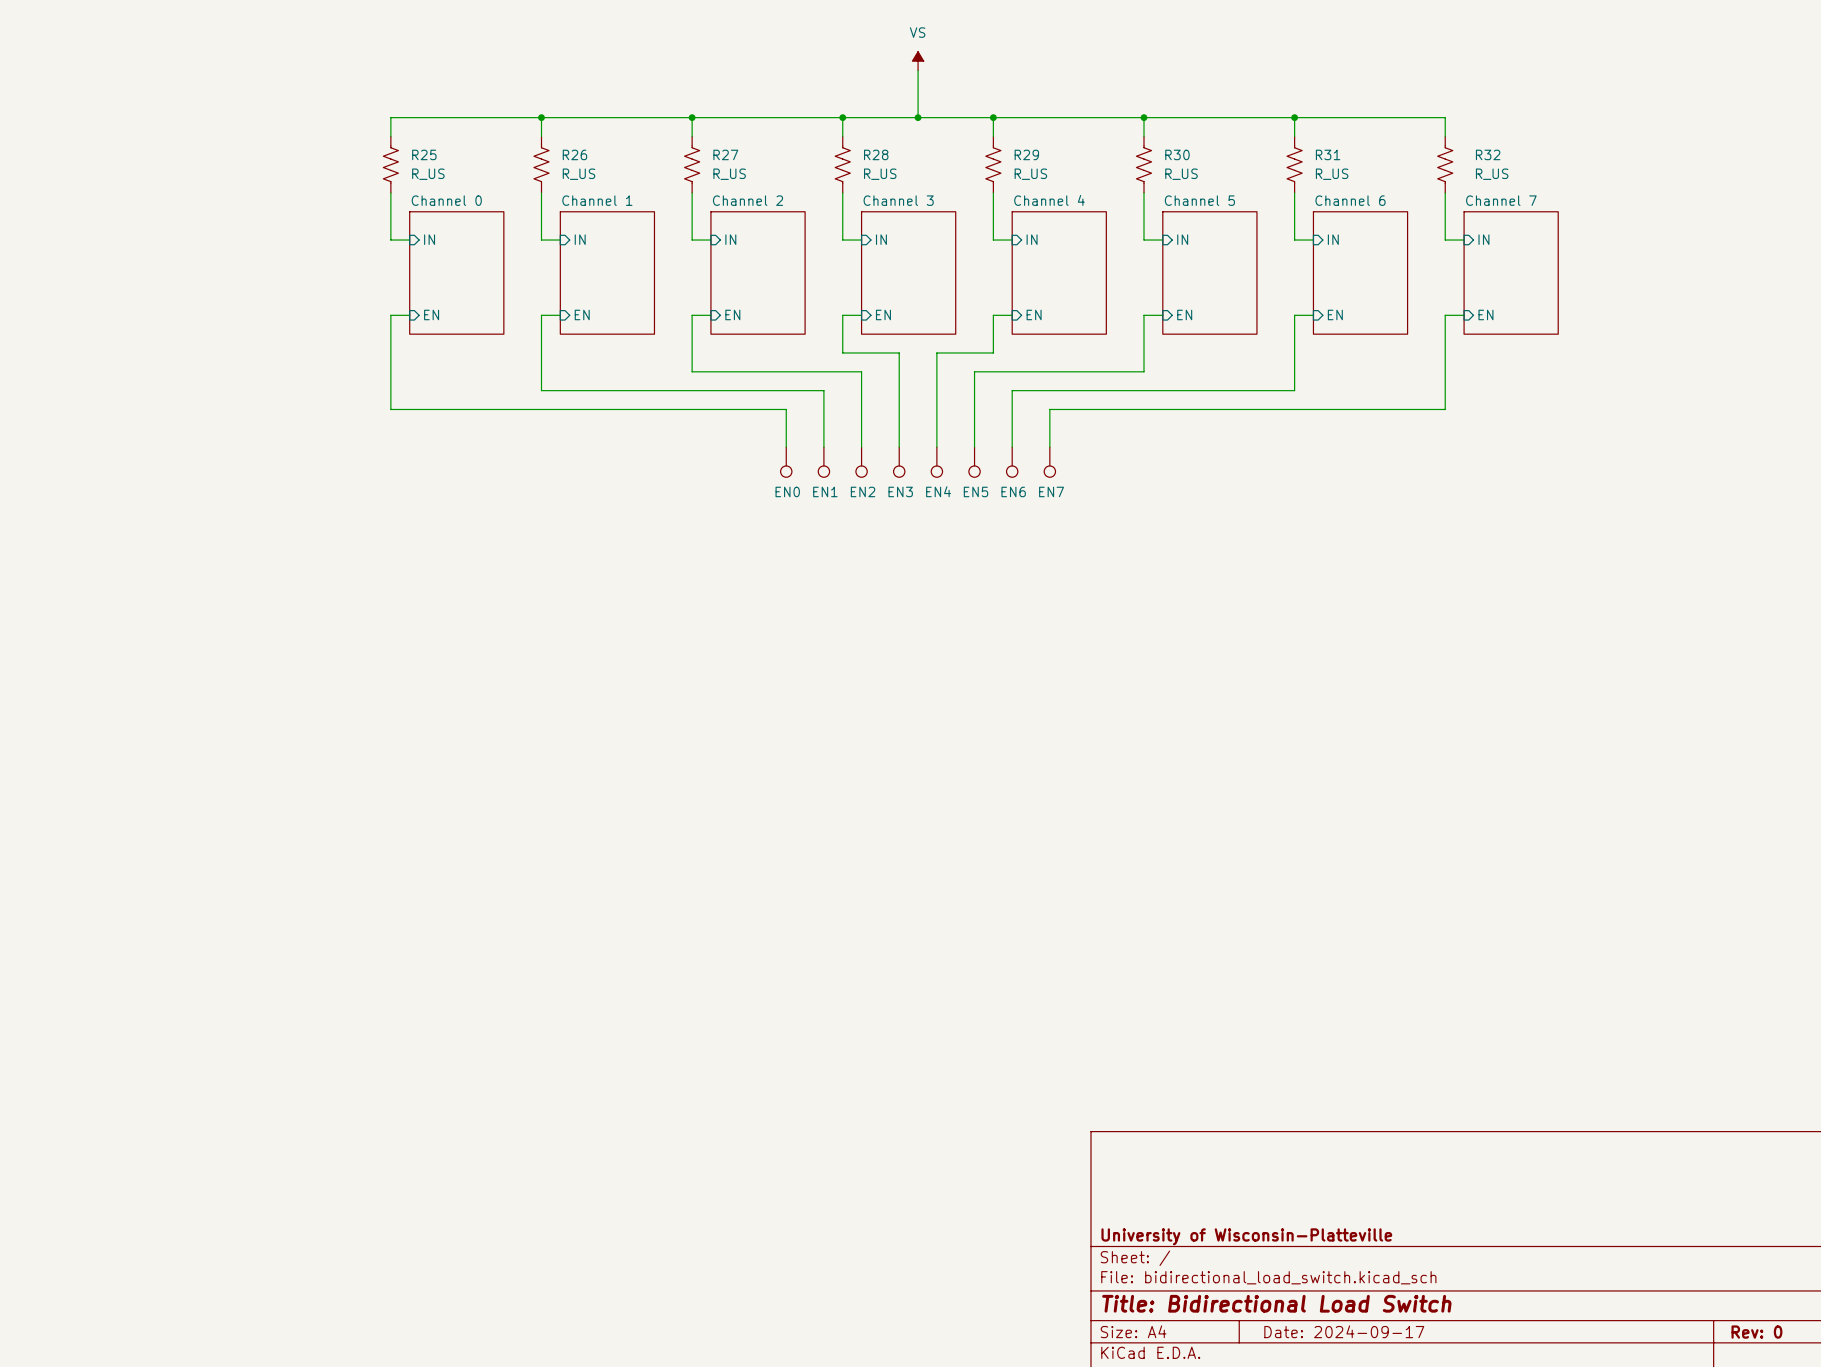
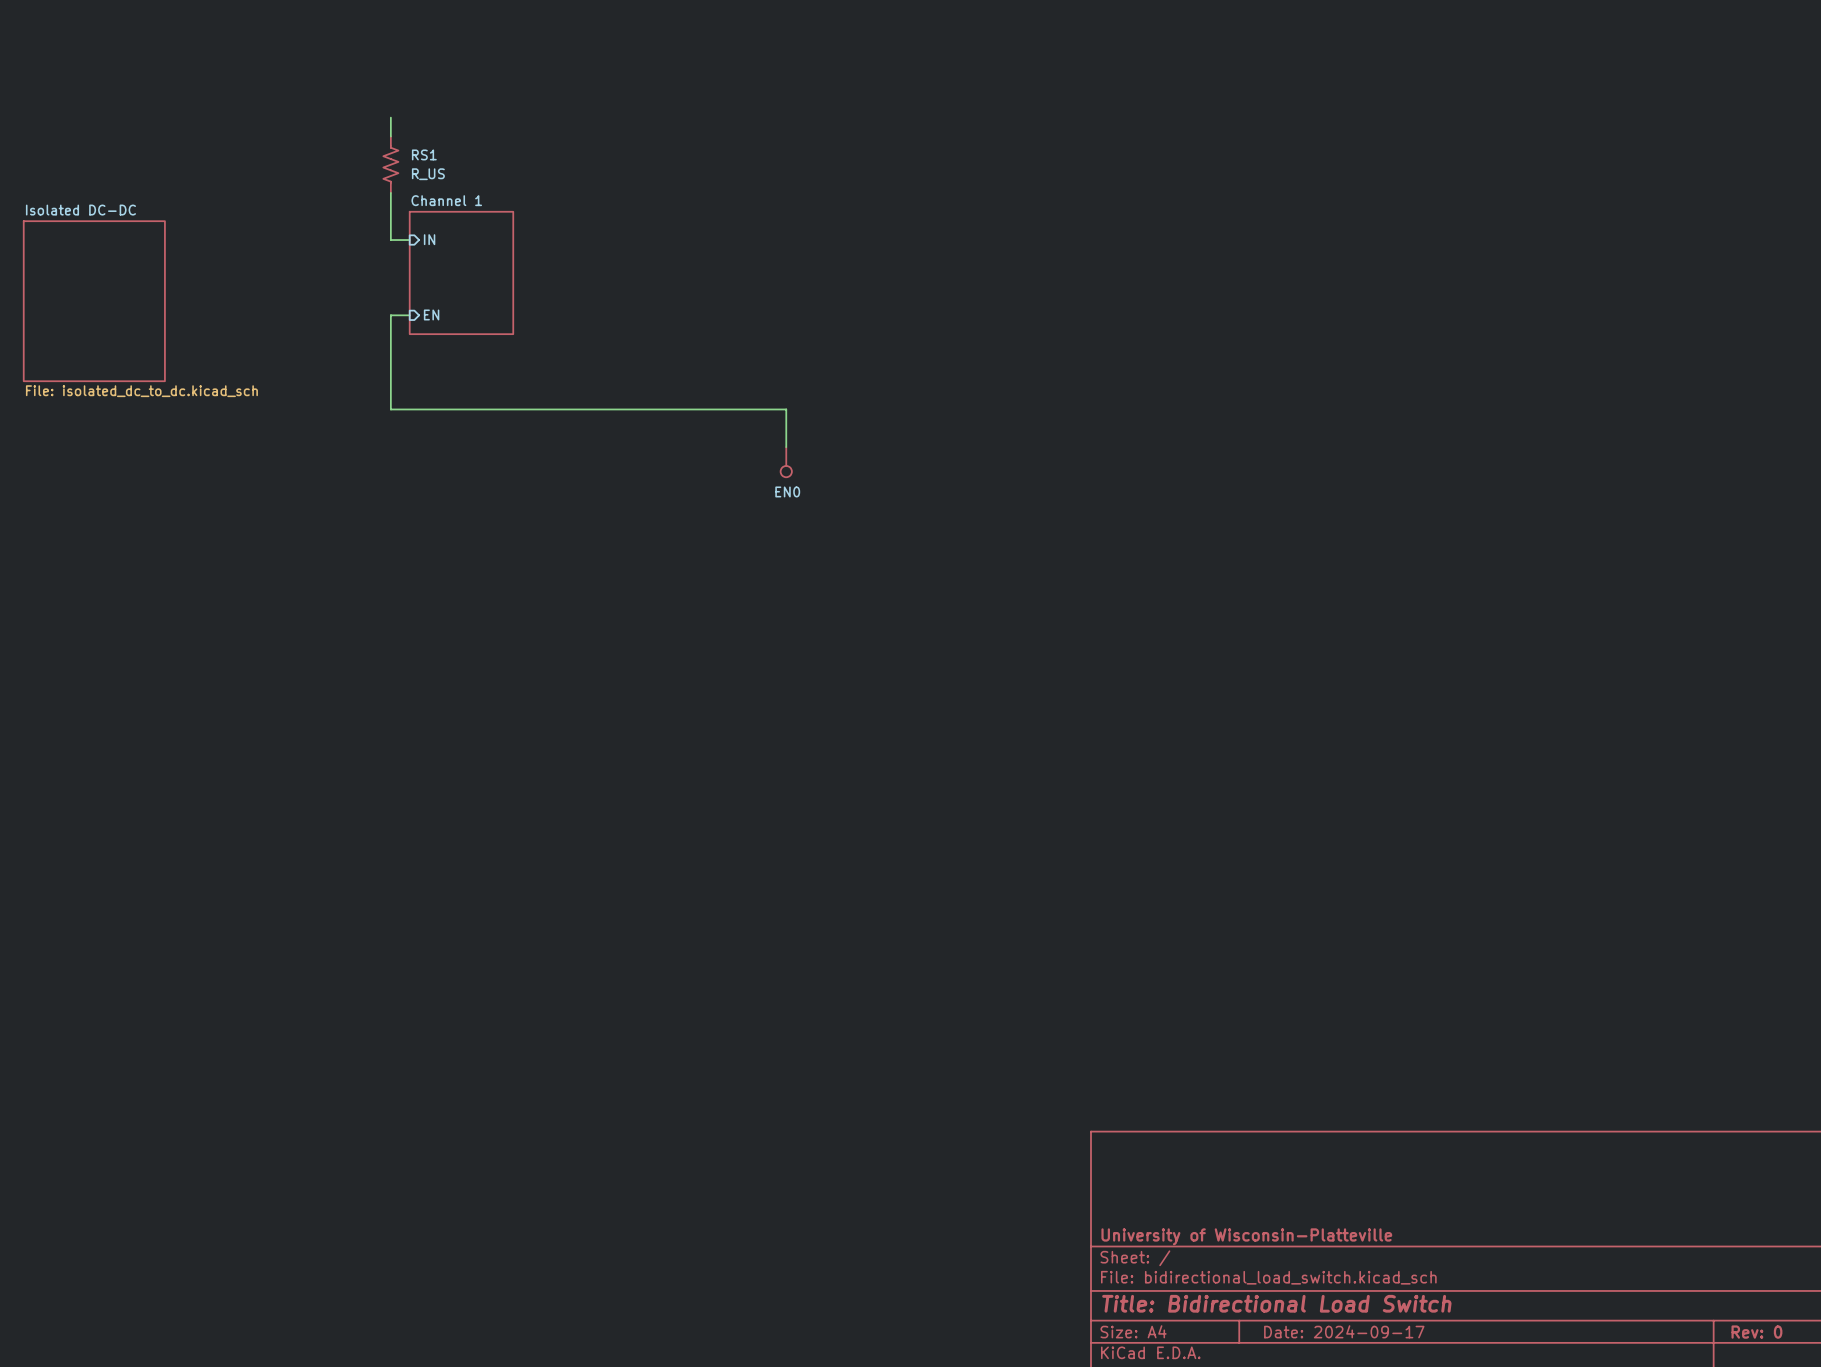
power symbol: VS (918, 61) -> none
wire: (918, 70) (918, 117) -> none
wire: (390, 117) (1445, 117) (1445, 136) -> none
wire: (541, 117) (541, 136) -> none
junction: (541, 117) -> none
wire: (692, 117) (692, 136) -> none
junction: (692, 117) -> none
wire: (842, 117) (842, 136) -> none
junction: (842, 117) -> none
junction: (918, 117) -> none
wire: (993, 117) (993, 136) -> none
junction: (993, 117) -> none
wire: (1143, 117) (1143, 136) -> none
junction: (1143, 117) -> none
wire: (1294, 117) (1294, 136) -> none
junction: (1294, 117) -> none
R25 name: R25 (424, 154) -> RS1 (424, 154)
R26: R_US (541, 164) -> none
R27: R_US (692, 164) -> none
R28: R_US (842, 164) -> none
R29: R_US (993, 164) -> none
R30: R_US (1143, 164) -> none
R31: R_US (1294, 164) -> none
R32: R_US (1445, 164) -> none
wire: (541, 192) (541, 240) (560, 240) -> none
wire: (692, 192) (692, 240) (710, 240) -> none
wire: (842, 192) (842, 240) (861, 240) -> none
wire: (993, 192) (993, 240) (1012, 240) -> none
wire: (1143, 192) (1143, 240) (1162, 240) -> none
wire: (1294, 192) (1294, 240) (1313, 240) -> none
wire: (1445, 192) (1445, 240) (1464, 240) -> none
sheet Channel 1 shape: [559, 211, 656, 335] -> [409, 211, 514, 335]
sheet pin: IN (580, 239) -> none
sheet pin: IN (730, 239) -> none
sheet pin: IN (881, 239) -> none
sheet pin: IN (1032, 239) -> none
sheet pin: IN (1182, 239) -> none
sheet pin: IN (1333, 239) -> none
sheet pin: IN (1483, 239) -> none
sheet Channel 0: (456, 272) -> none
sheet Channel 2: (758, 272) -> none
sheet Channel 3: (908, 272) -> none
sheet Channel 4: (1059, 272) -> none
sheet Channel 5: (1209, 272) -> none
sheet Channel 6: (1360, 272) -> none
sheet Channel 7: (1511, 272) -> none
sheet Isolated DC-DC: none -> File: isolated_dc_to_dc.kicad_sch (94, 301)
sheet pin: EN (582, 314) -> none
sheet pin: EN (732, 314) -> none
sheet pin: EN (883, 314) -> none
sheet pin: EN (1034, 314) -> none
sheet pin: EN (1184, 314) -> none
sheet pin: EN (1335, 314) -> none
sheet pin: EN (1485, 314) -> none
wire: (560, 315) (541, 315) (541, 390) (823, 390) (823, 447) -> none
wire: (710, 315) (692, 315) (692, 371) (861, 371) (861, 447) -> none
wire: (861, 315) (842, 315) (842, 352) (899, 352) (899, 447) -> none
wire: (1012, 315) (993, 315) (993, 352) (936, 352) (936, 447) -> none
wire: (1162, 315) (1143, 315) (1143, 371) (974, 371) (974, 447) -> none
wire: (1313, 315) (1294, 315) (1294, 390) (1012, 390) (1012, 447) -> none
wire: (1464, 315) (1445, 315) (1445, 409) (1049, 409) (1049, 447) -> none
EN1: (823, 462) -> none
EN2: (861, 462) -> none
EN3: (899, 462) -> none
EN4: (936, 462) -> none
EN5: (974, 462) -> none
EN6: (1012, 462) -> none
EN7: (1049, 462) -> none

